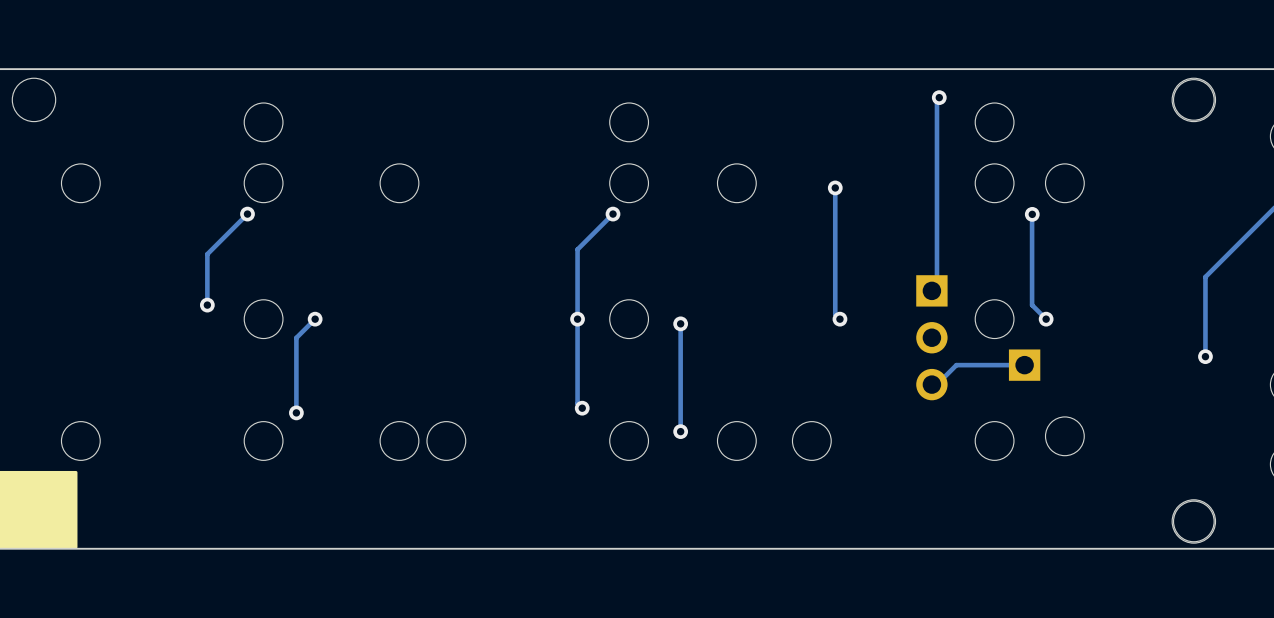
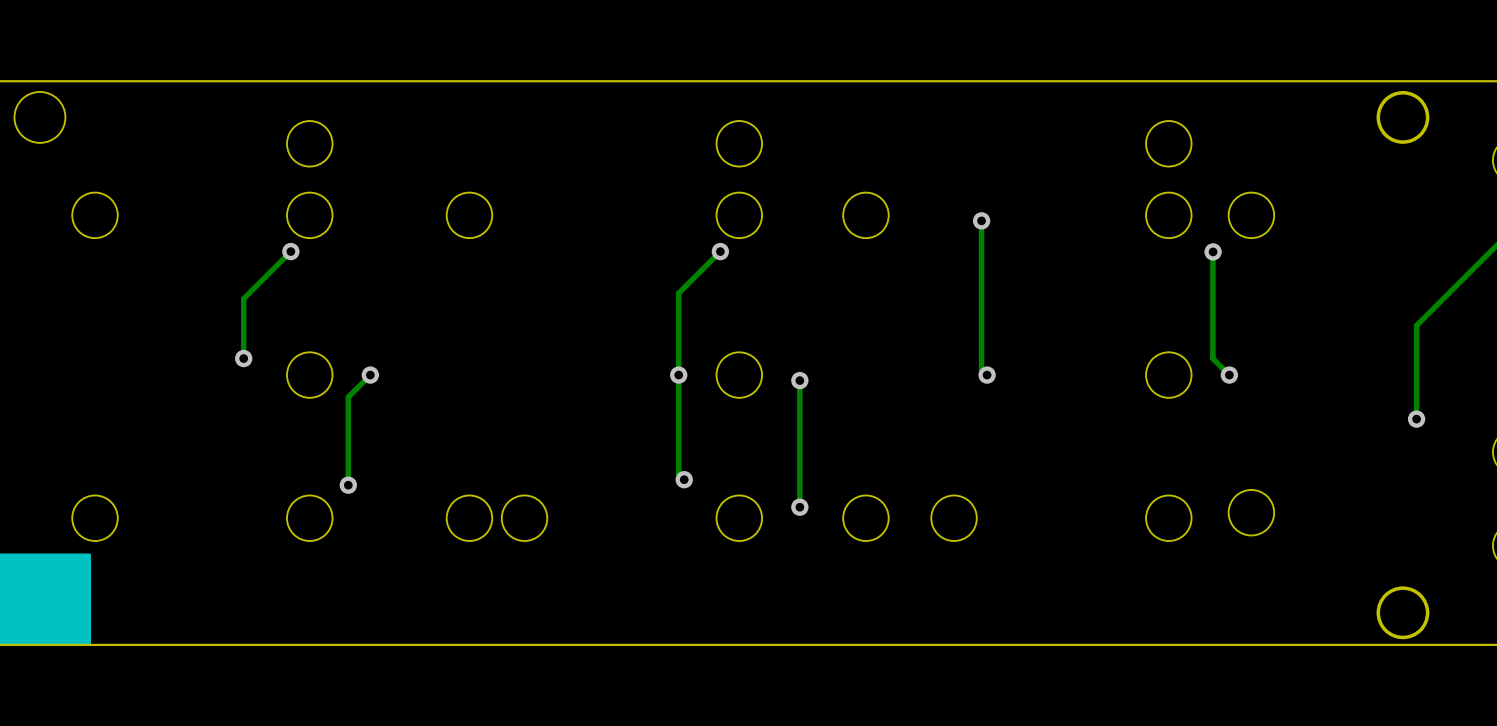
track: (939, 97) (936, 99) (936, 290) -> none
via: (939, 97) -> none
part: (931, 337) -> none
track: (1024, 365) (956, 365) (936, 384) -> none
part: (1024, 365) -> none

